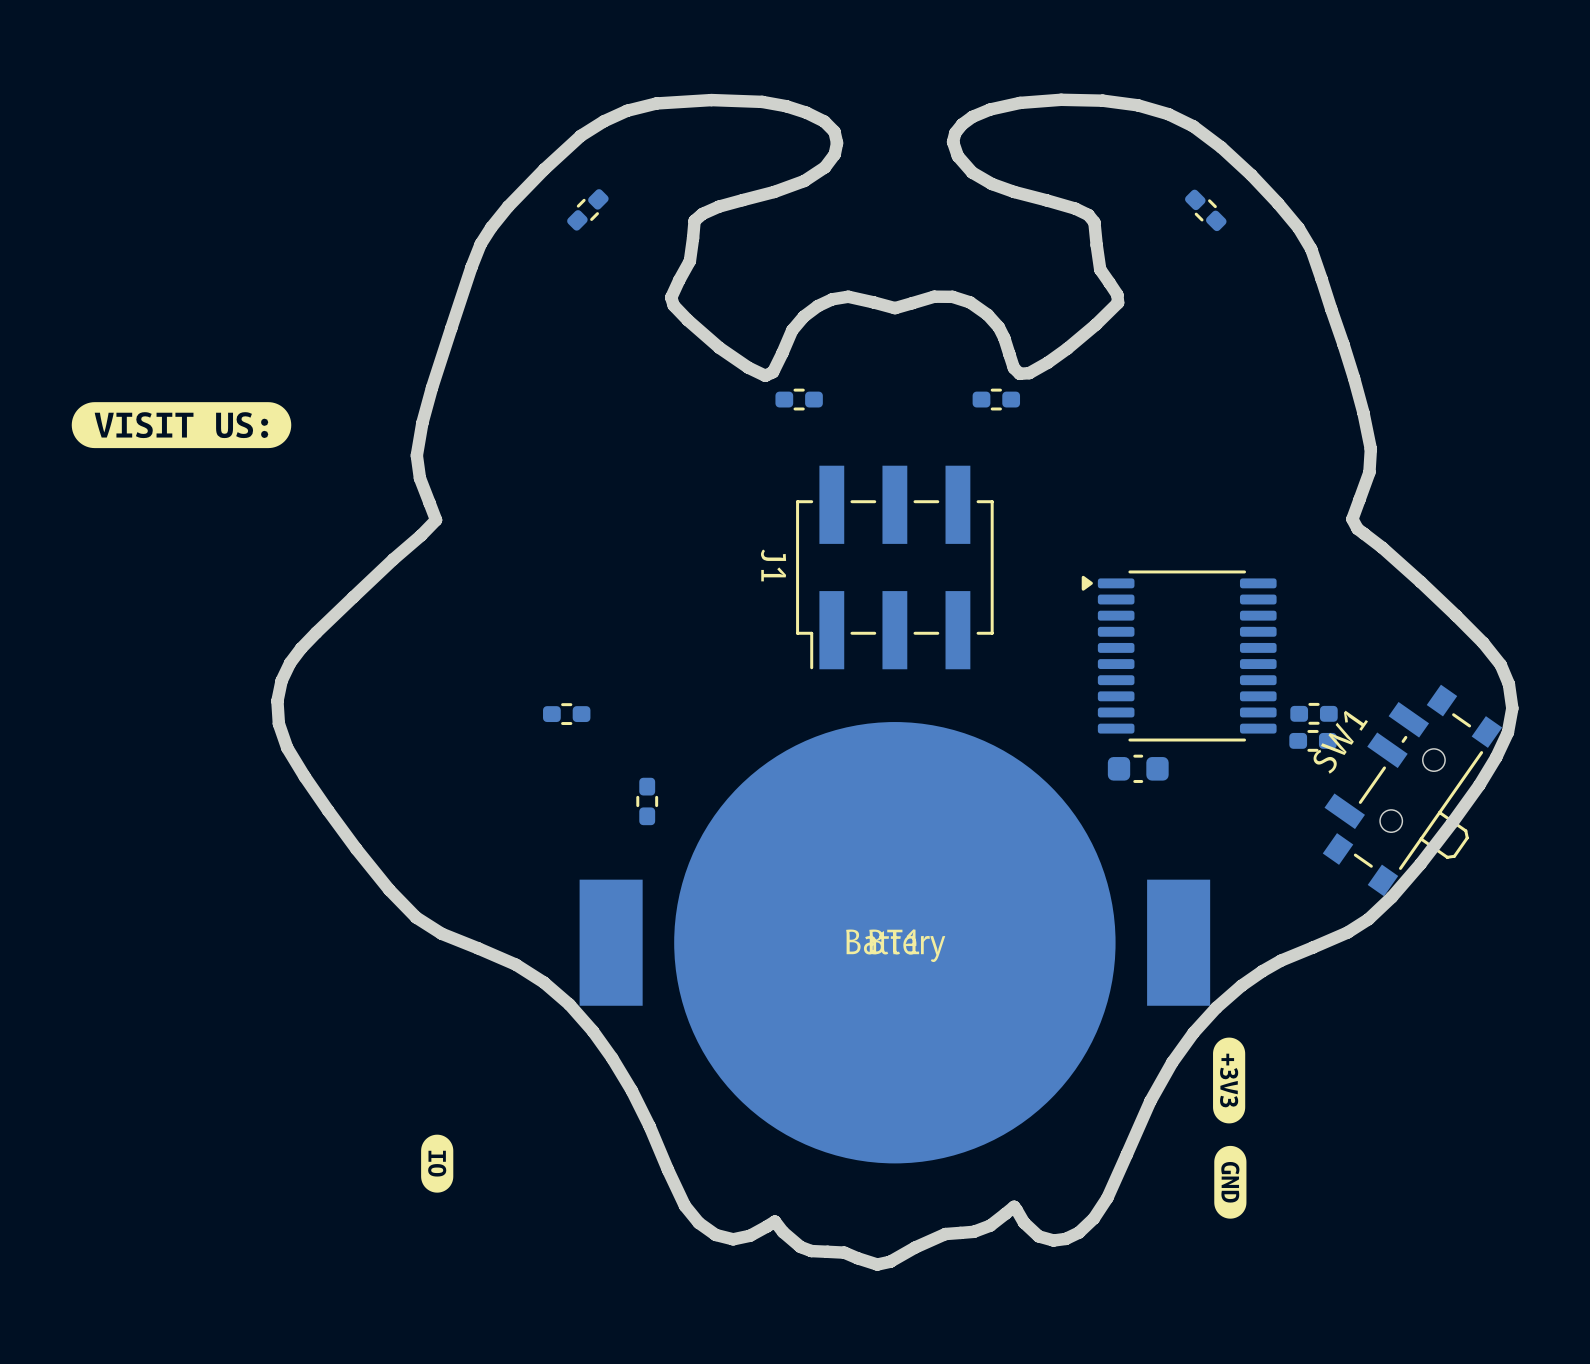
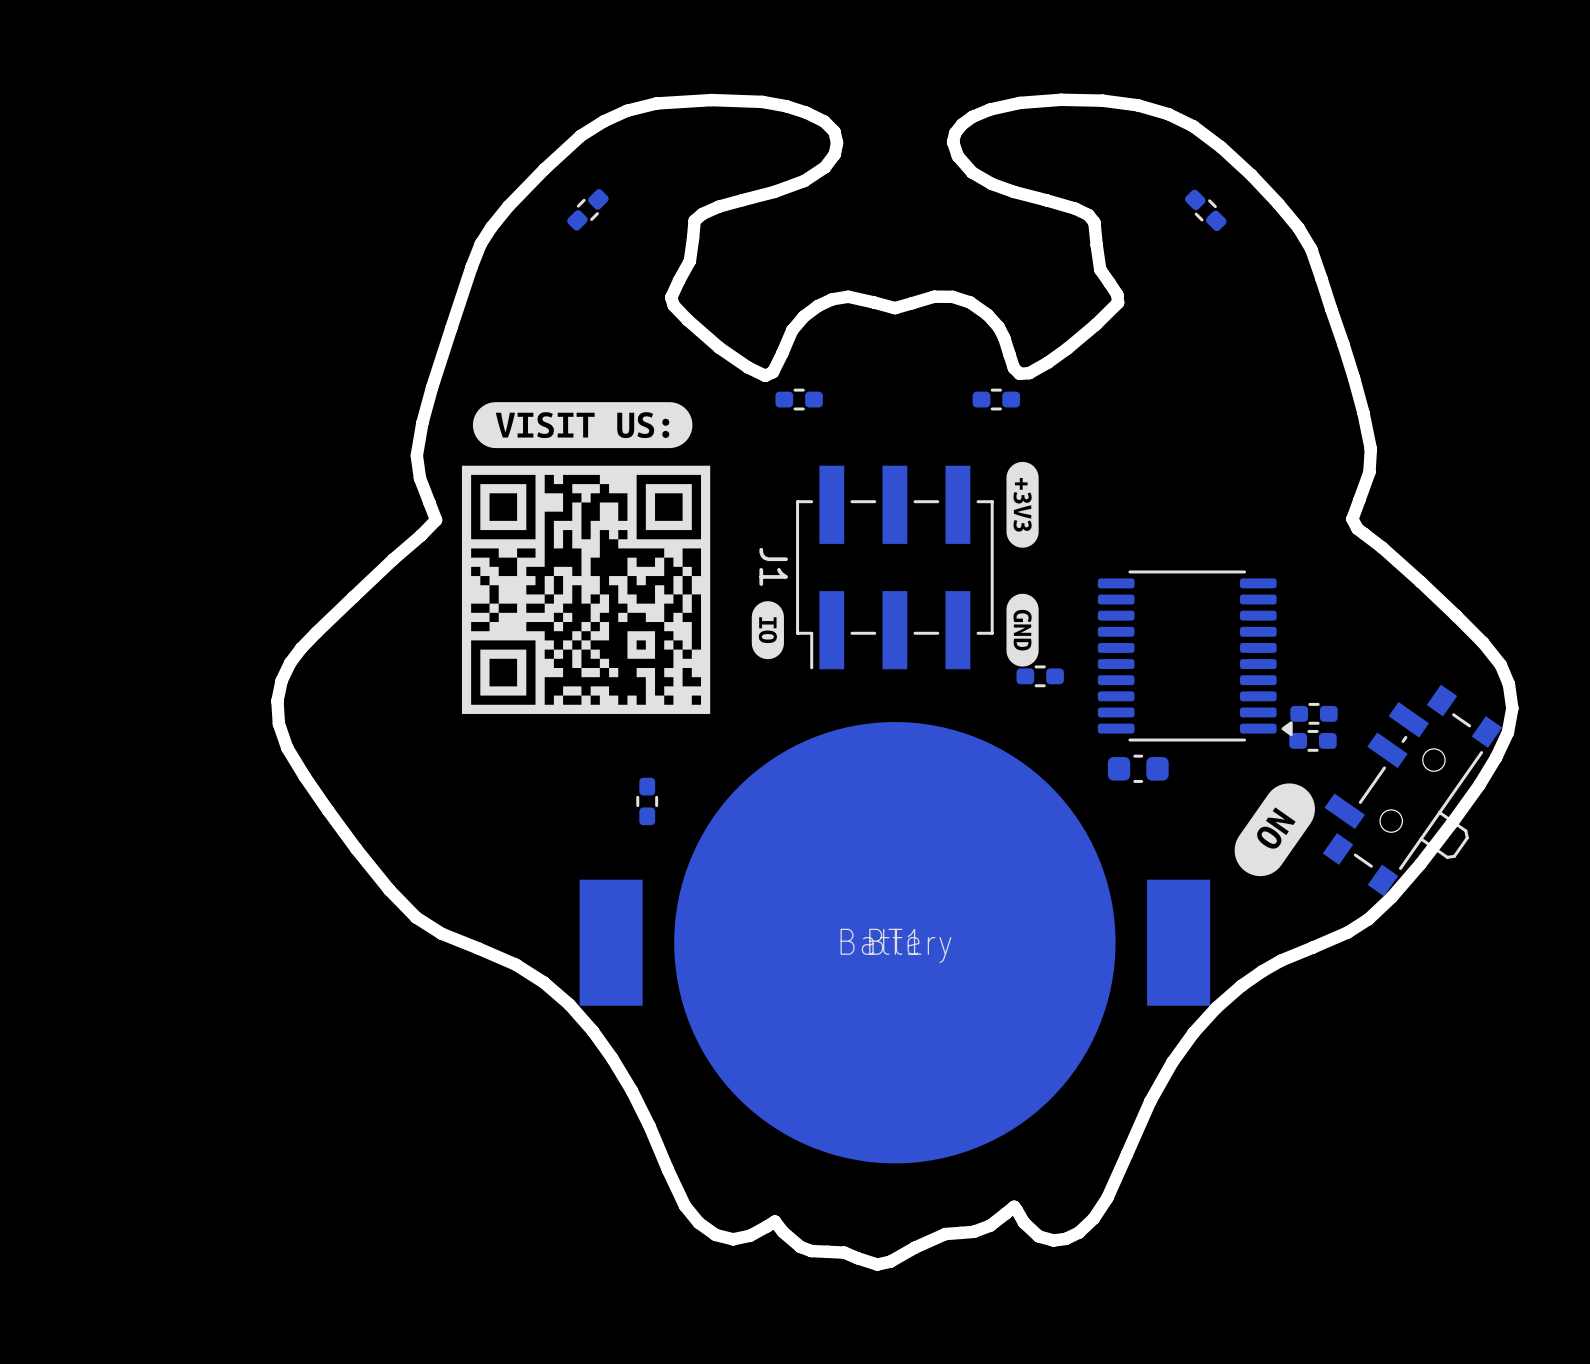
drawing position: (181, 425) -> (582, 425)
drawing: none -> [461, 465, 711, 714]
drawing: none -> [751, 601, 784, 660]
part rotation: 0° (1179, 655) -> 180° (1195, 655)
part position: (566, 714) -> (1040, 676)
SW1 name: SW1 (1340, 742) -> none
drawing: none -> [1234, 783, 1315, 877]
drawing position: (1229, 1080) -> (1022, 504)
drawing: [421, 1134, 454, 1193] -> none
drawing position: (1230, 1182) -> (1022, 630)

